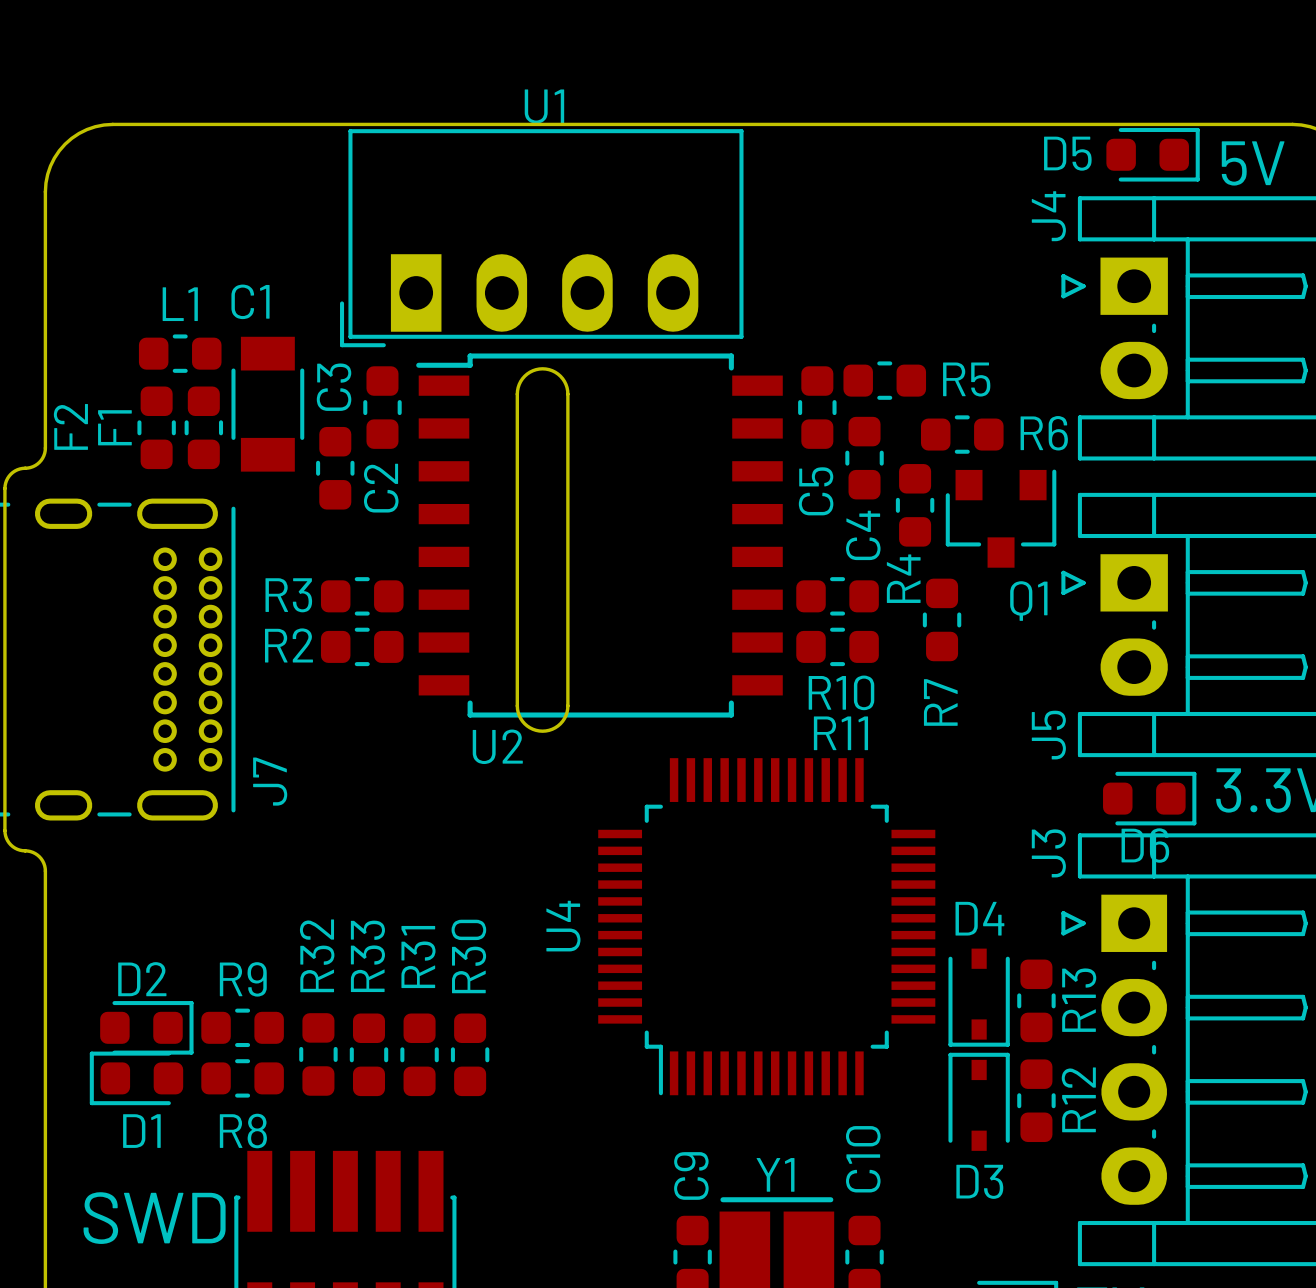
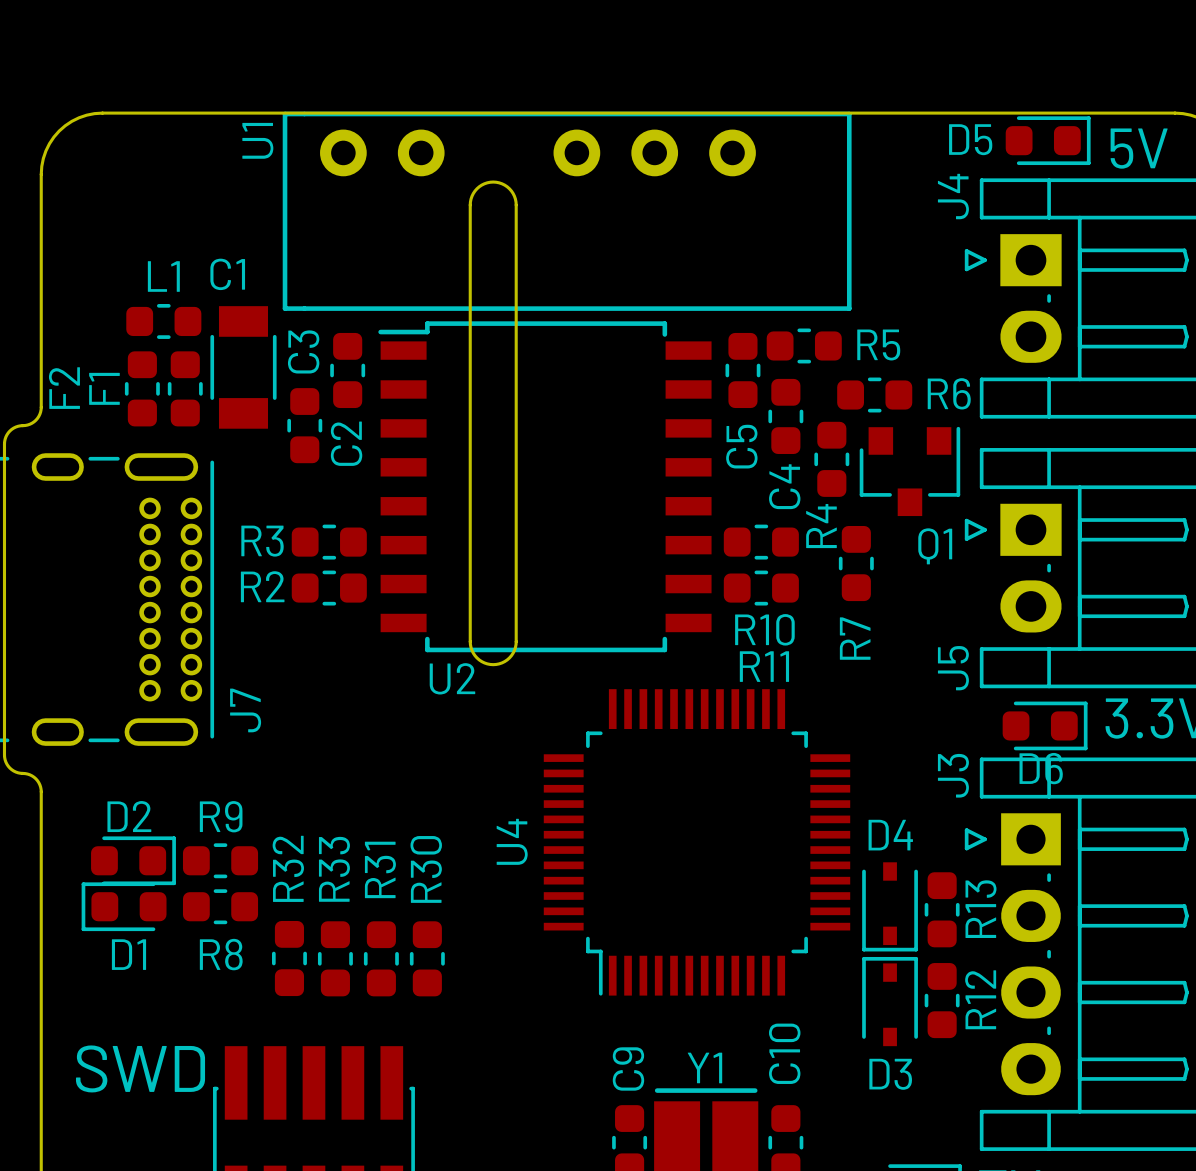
U1 name position: U1 (544, 106) -> U1 (257, 140)
U1 footprint: [340, 129, 744, 348] -> [282, 111, 852, 311]
board edge: (517, 394) (519, 384) (524, 376) (532, 370) (542, 368) (552, 370) (560, 376) (565, 384) (567, 394) -> (470, 358) (470, 202) (473, 193) (479, 186) (493, 182) (507, 186) (513, 193) (516, 202) (516, 358)
D2 position: (146, 1027) -> (133, 860)
R9 position: (242, 1027) -> (220, 860)
D1 position: (136, 1078) -> (124, 906)
R8 position: (242, 1078) -> (220, 906)
text position: SWD (154, 1218) -> SWD (140, 1068)

